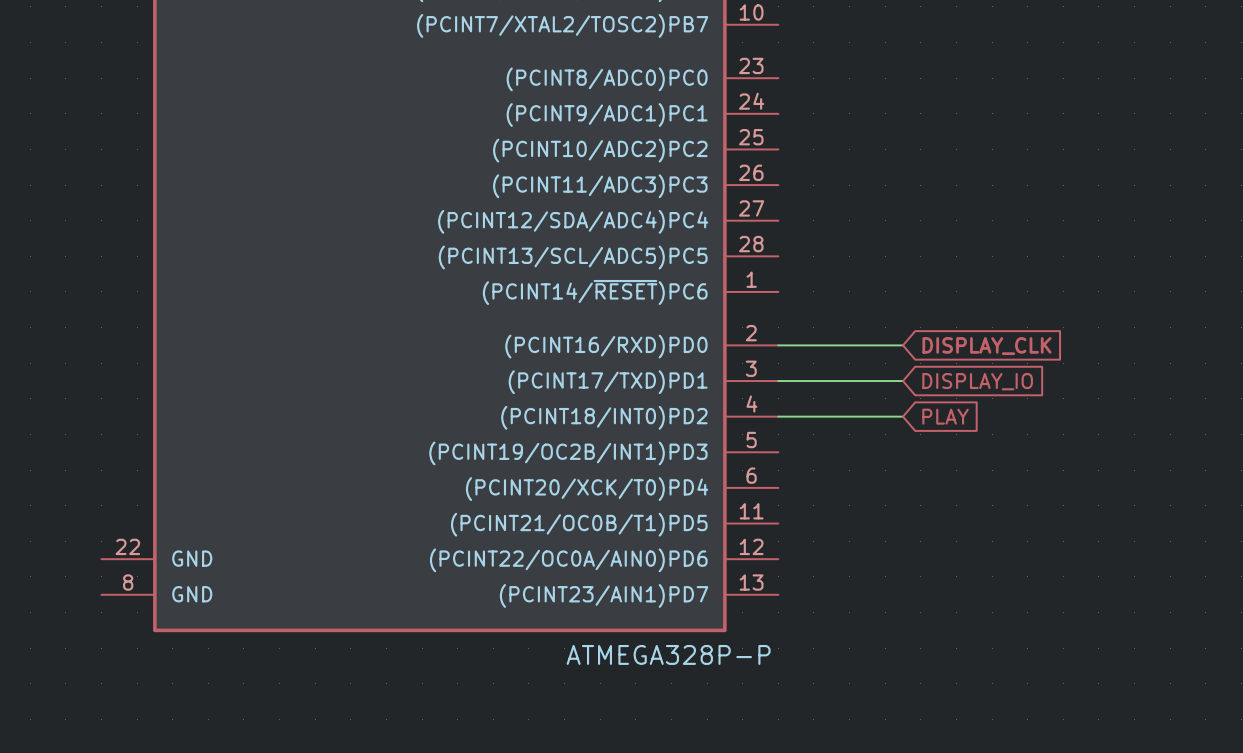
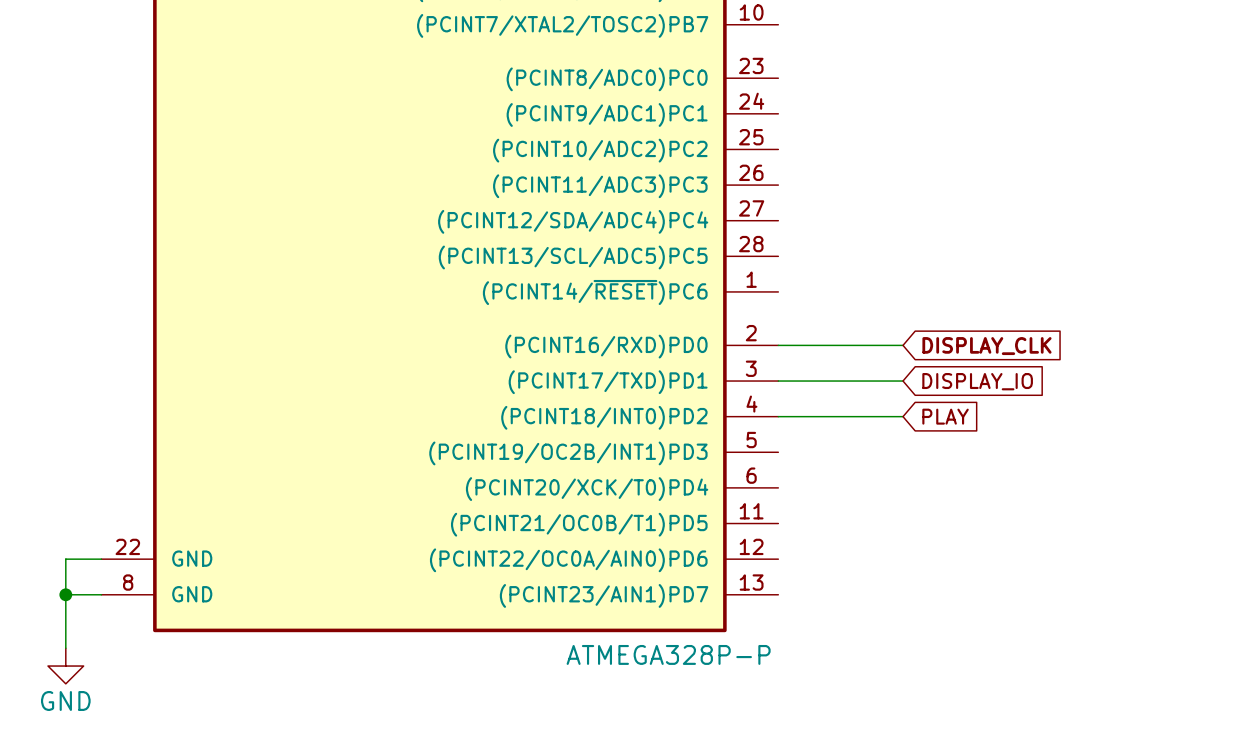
wire: none -> (101, 559) (65, 559) (65, 648)
wire: none -> (65, 594) (101, 594)
junction: none -> (65, 594)
power symbol: none -> GND (65, 666)

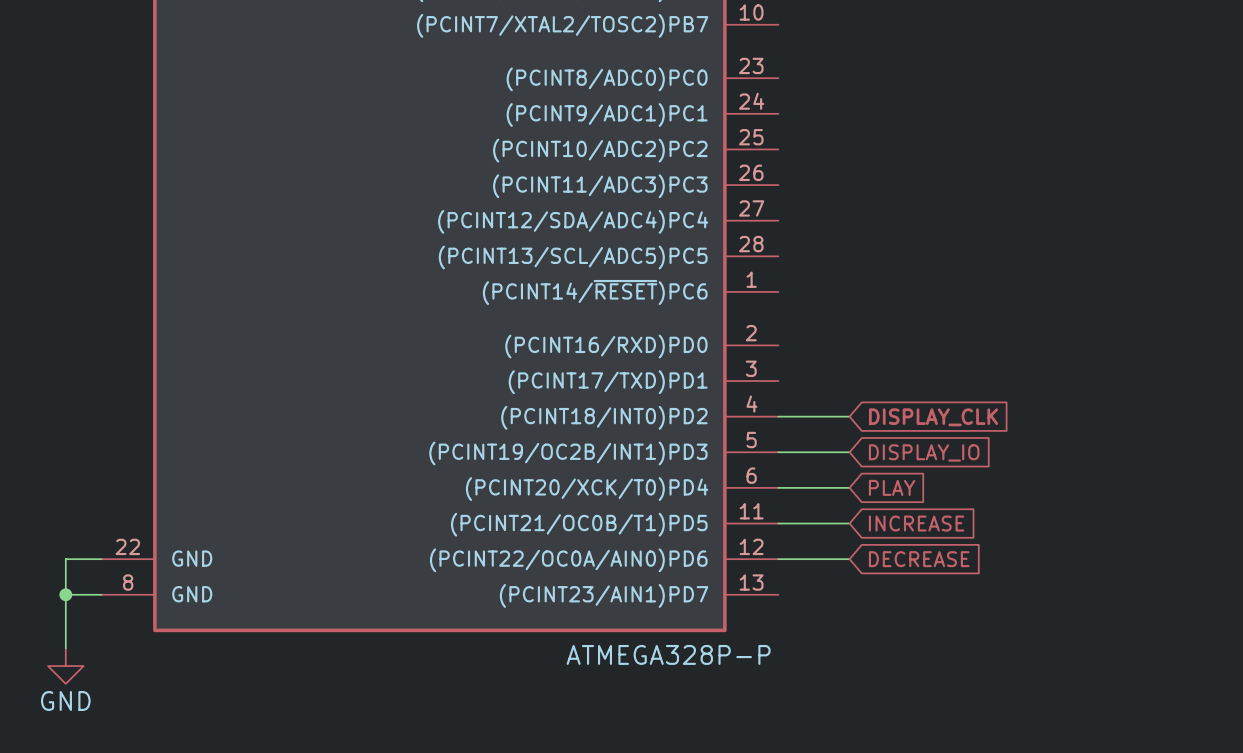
wire: (778, 345) (903, 345) -> none
global label position: DISPLAY_CLK (986, 346) -> DISPLAY_CLK (933, 417)
wire: (778, 381) (903, 381) -> none
global label position: DISPLAY_IO (977, 381) -> DISPLAY_IO (924, 452)
wire: (849, 416) (903, 416) -> none
global label position: PLAY (945, 416) -> PLAY (892, 487)
wire: none -> (778, 452) (849, 452)
wire: none -> (778, 487) (849, 487)
wire: none -> (778, 523) (849, 523)
global label: none -> INCREASE (916, 523)
wire: none -> (778, 559) (849, 559)
global label: none -> DECREASE (919, 559)

